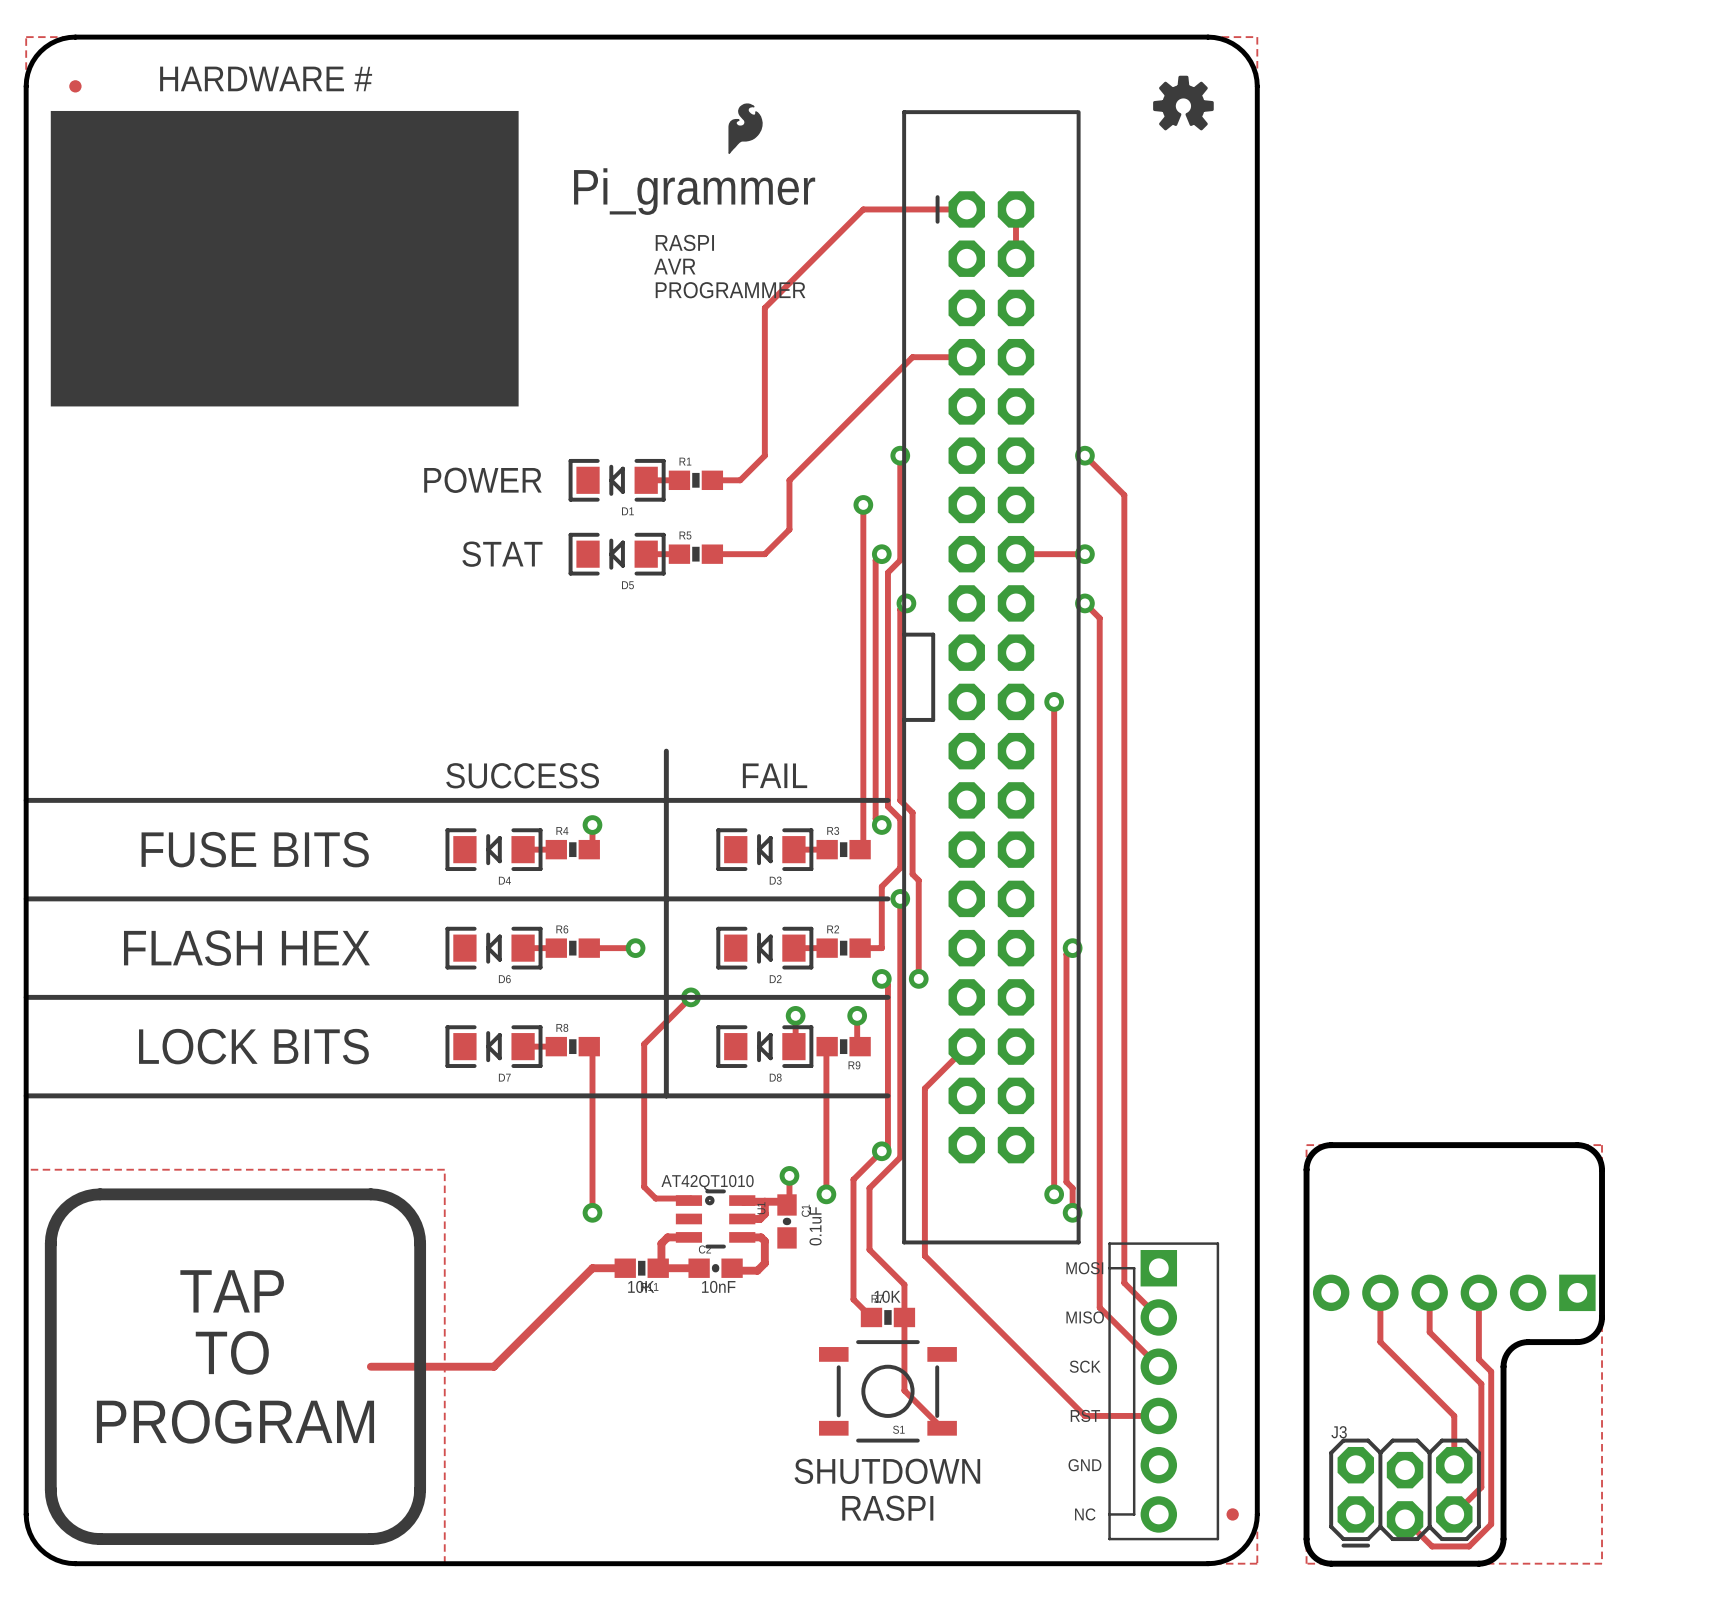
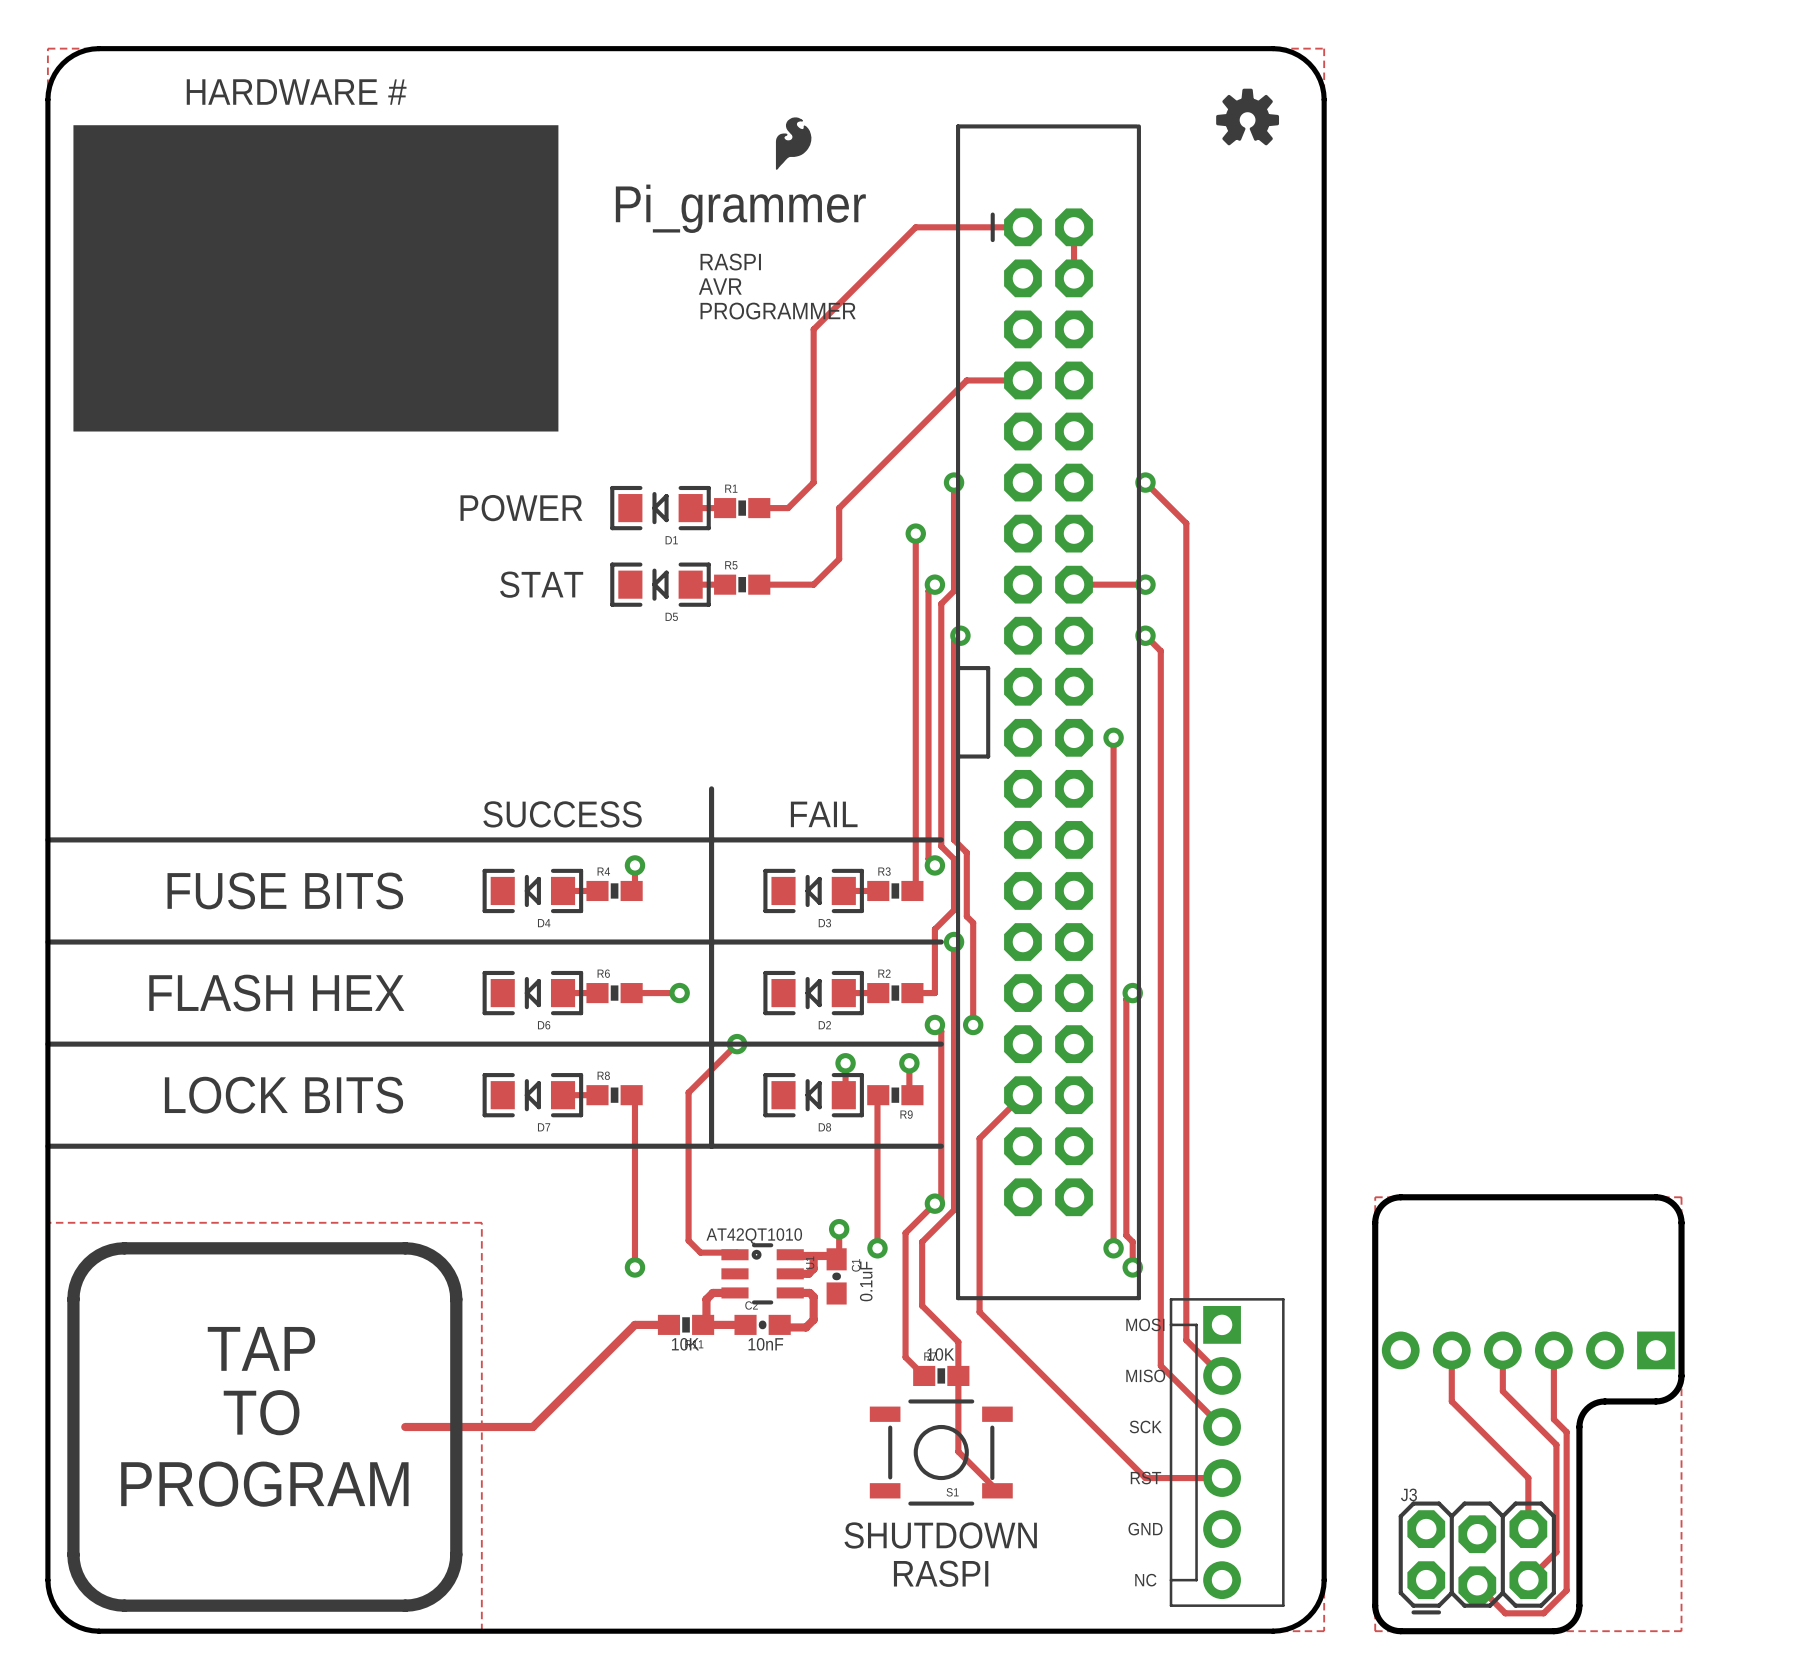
part: (75, 86) -> none
part: (1232, 1514) -> none

